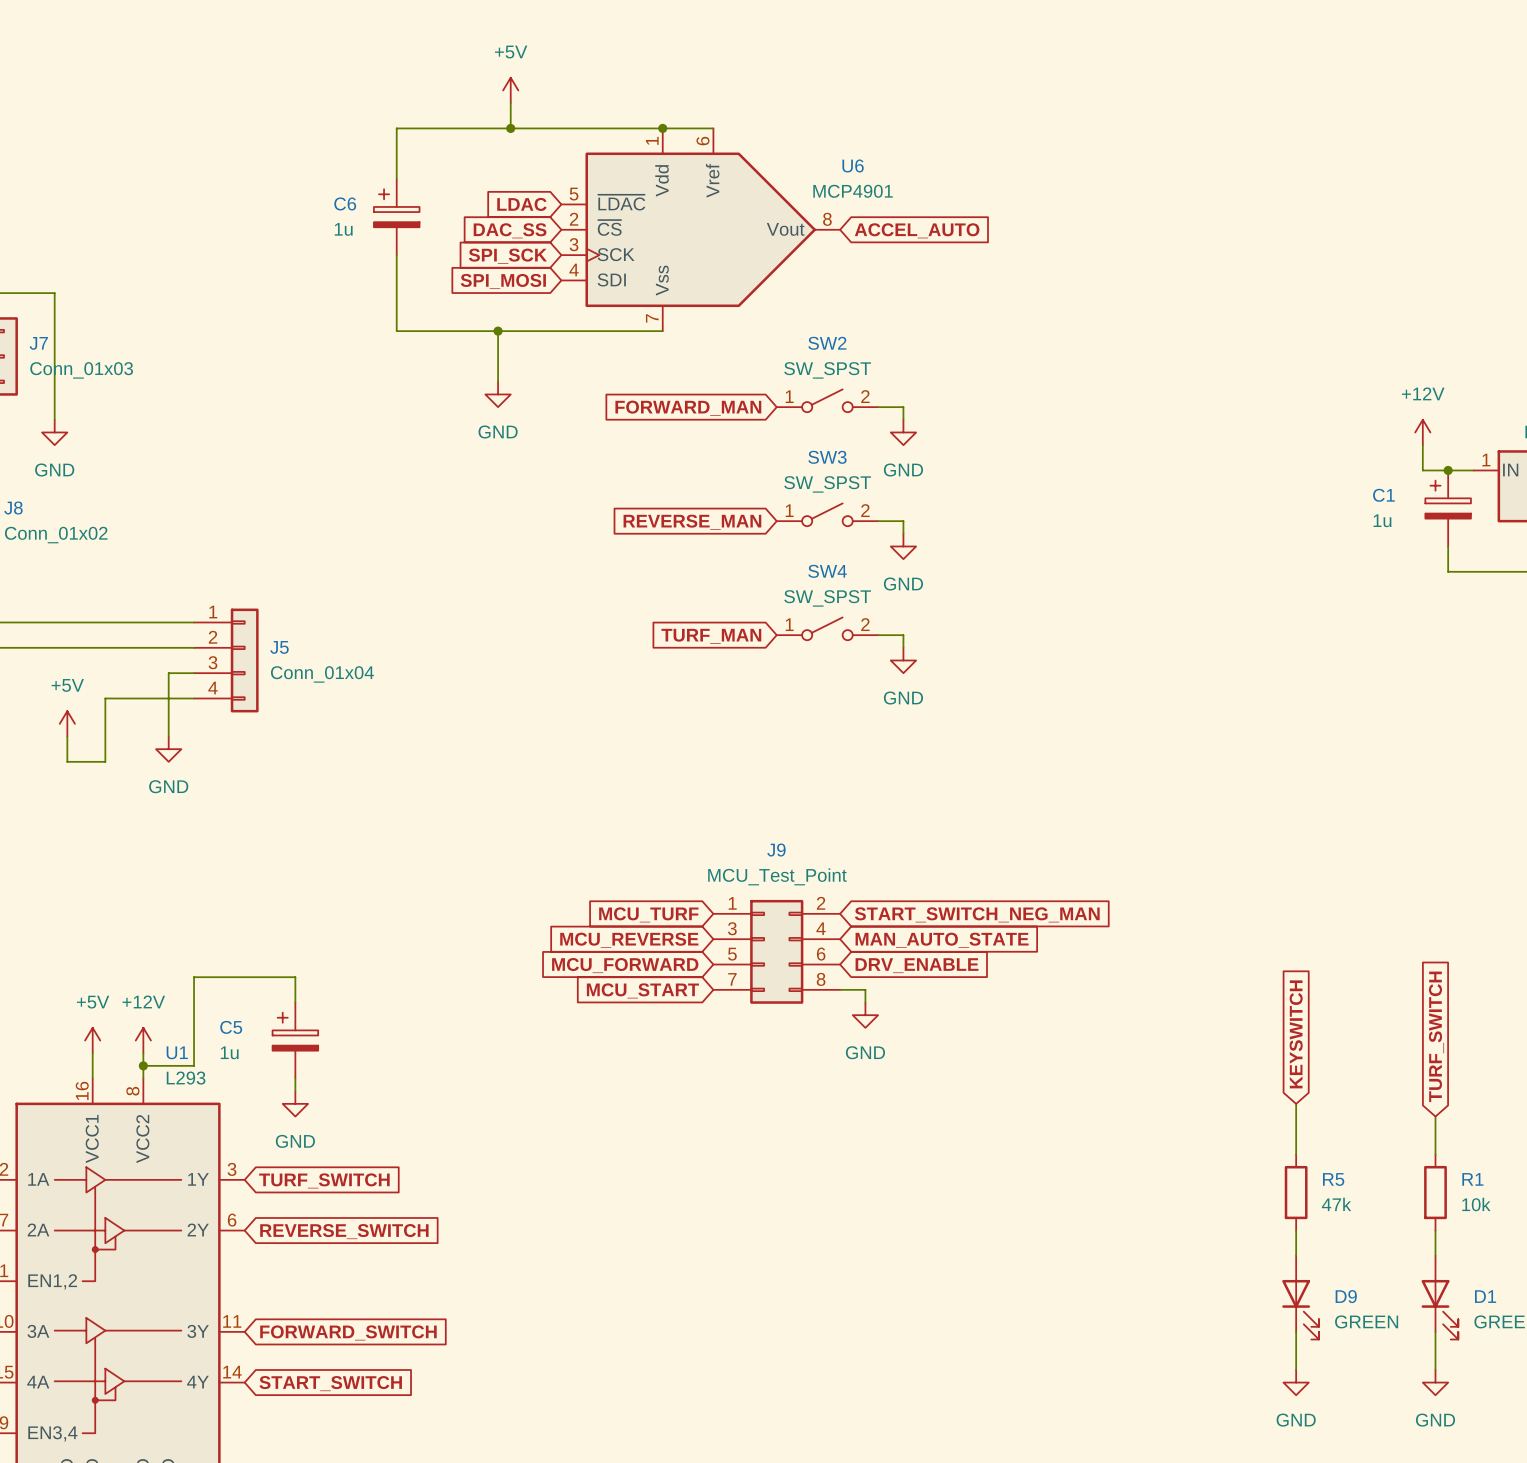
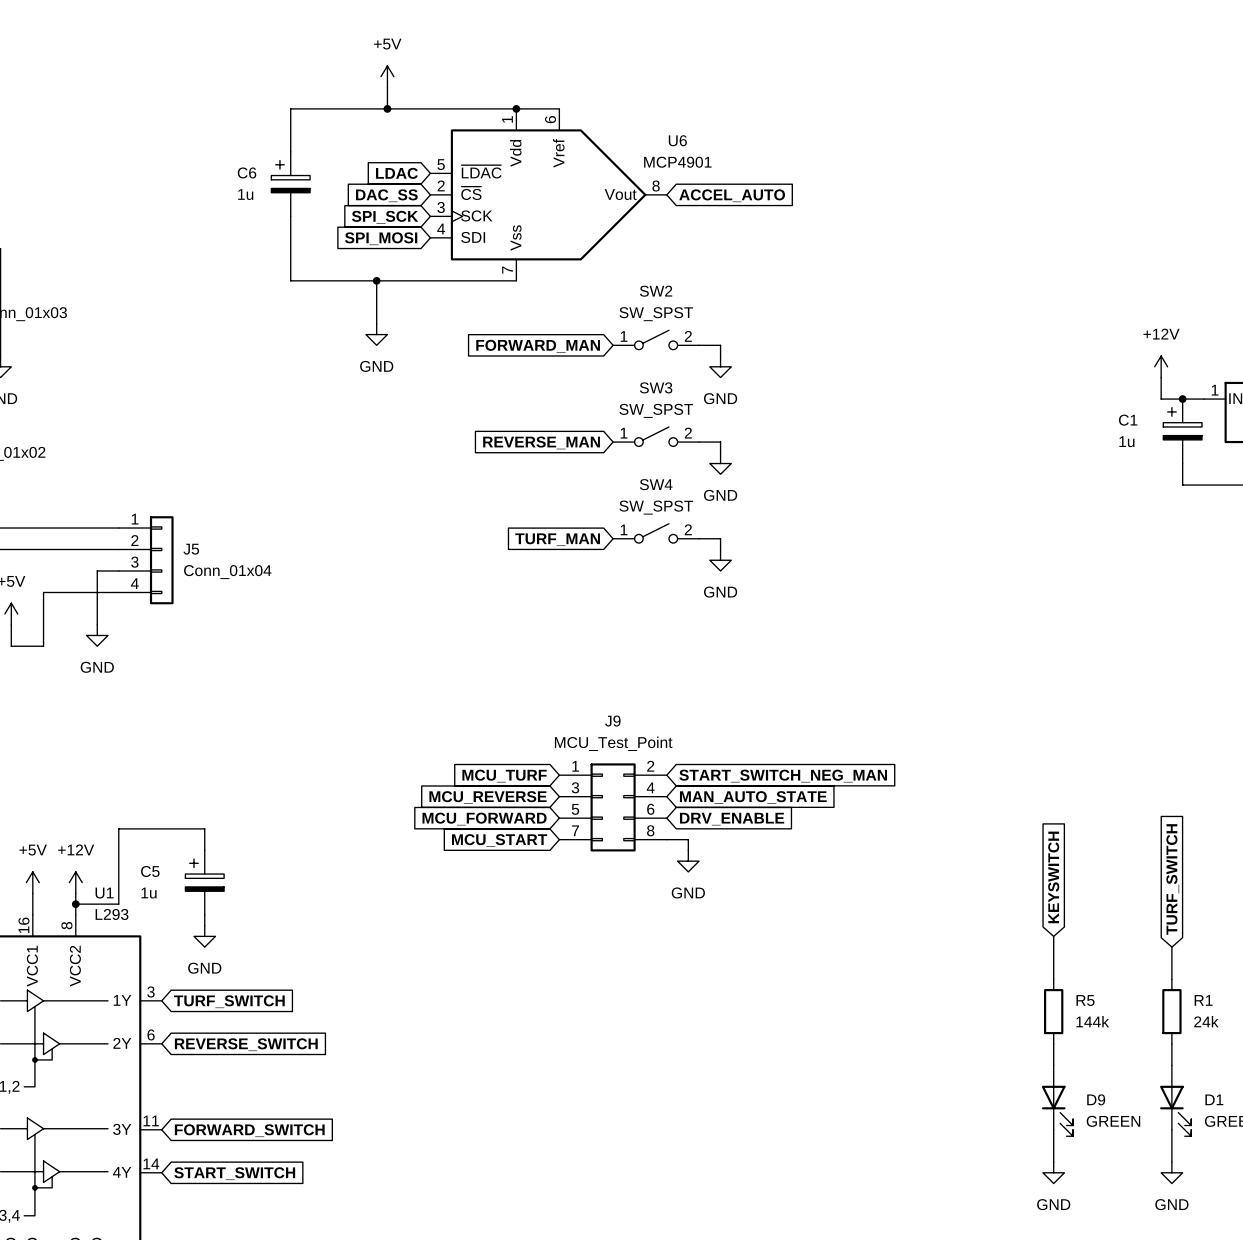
R5 value: 47k (1336, 1204) -> 144k (1092, 1021)
R1 value: 10k (1476, 1204) -> 24k (1206, 1021)

